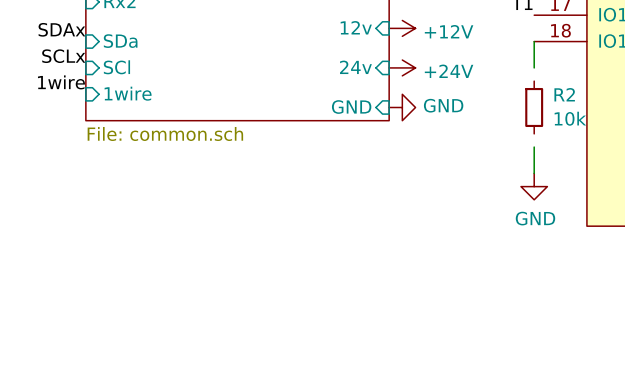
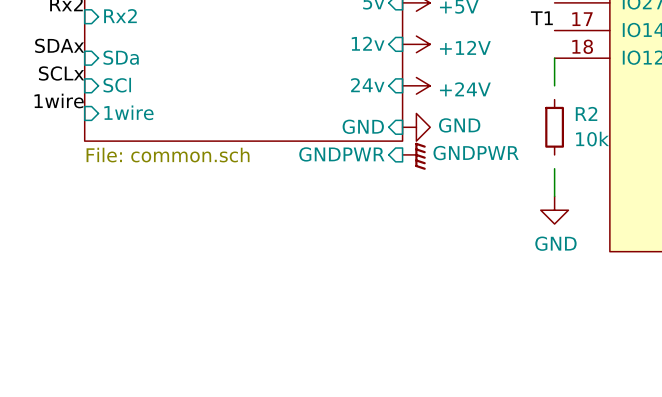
sheet pin: none -> GNDPWR (341, 154)
power symbol: none -> GNDPWR (414, 156)

